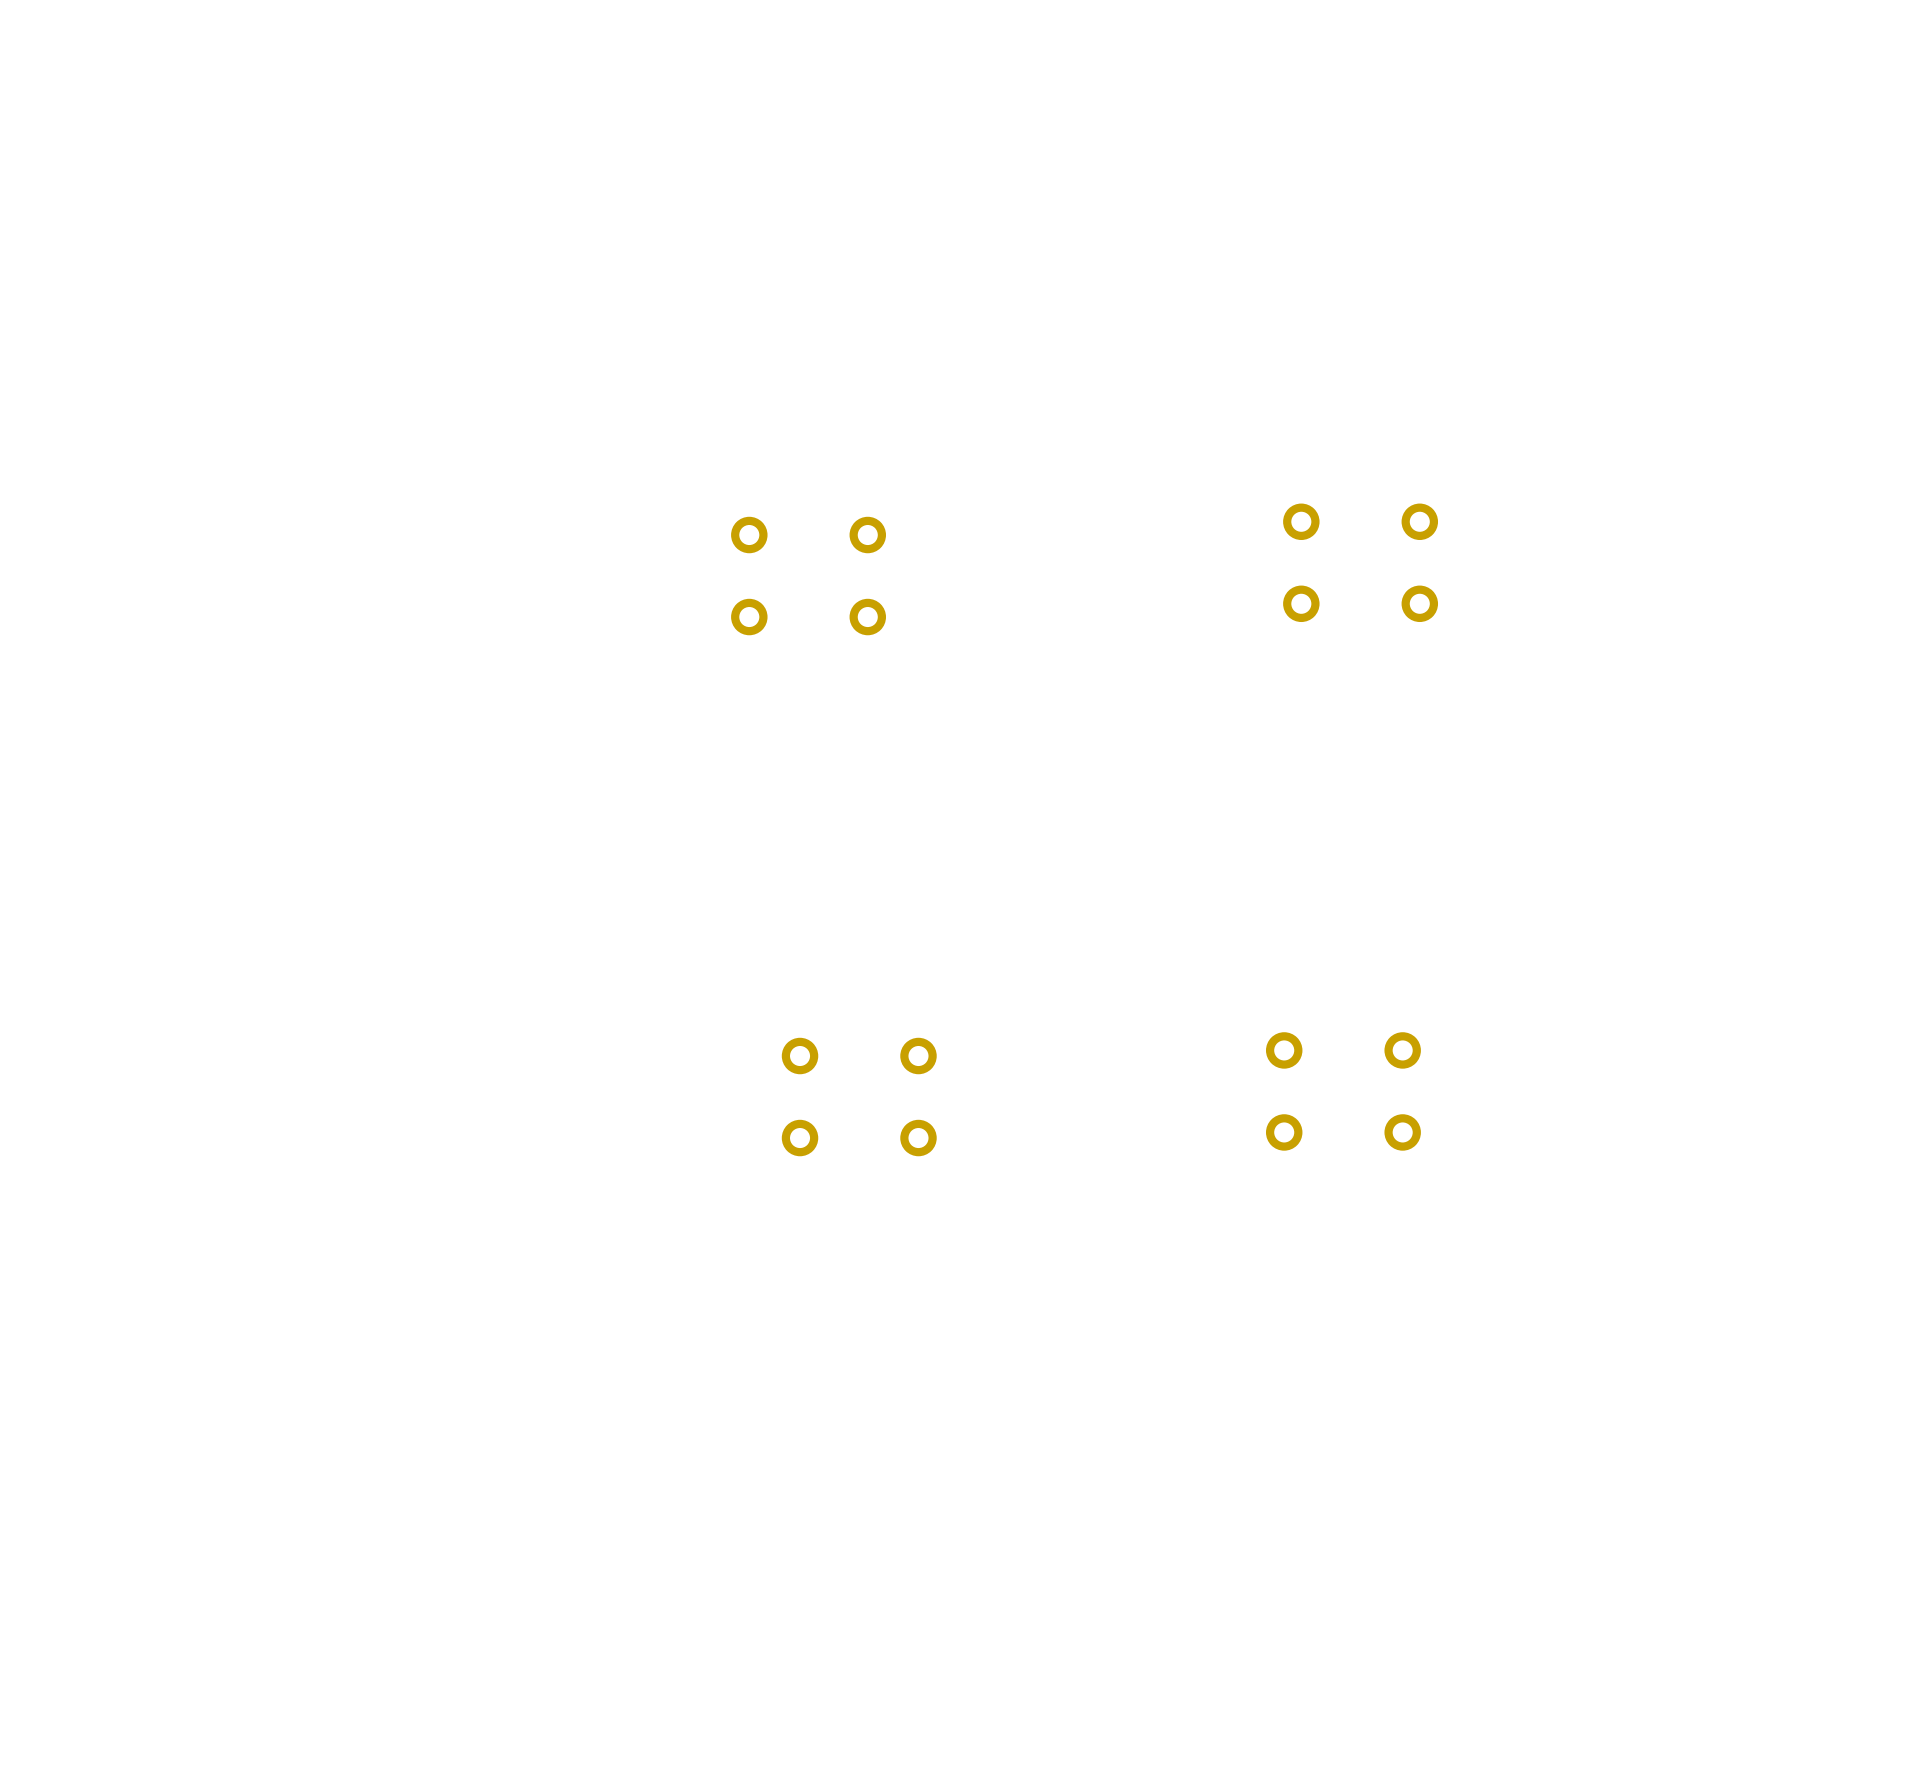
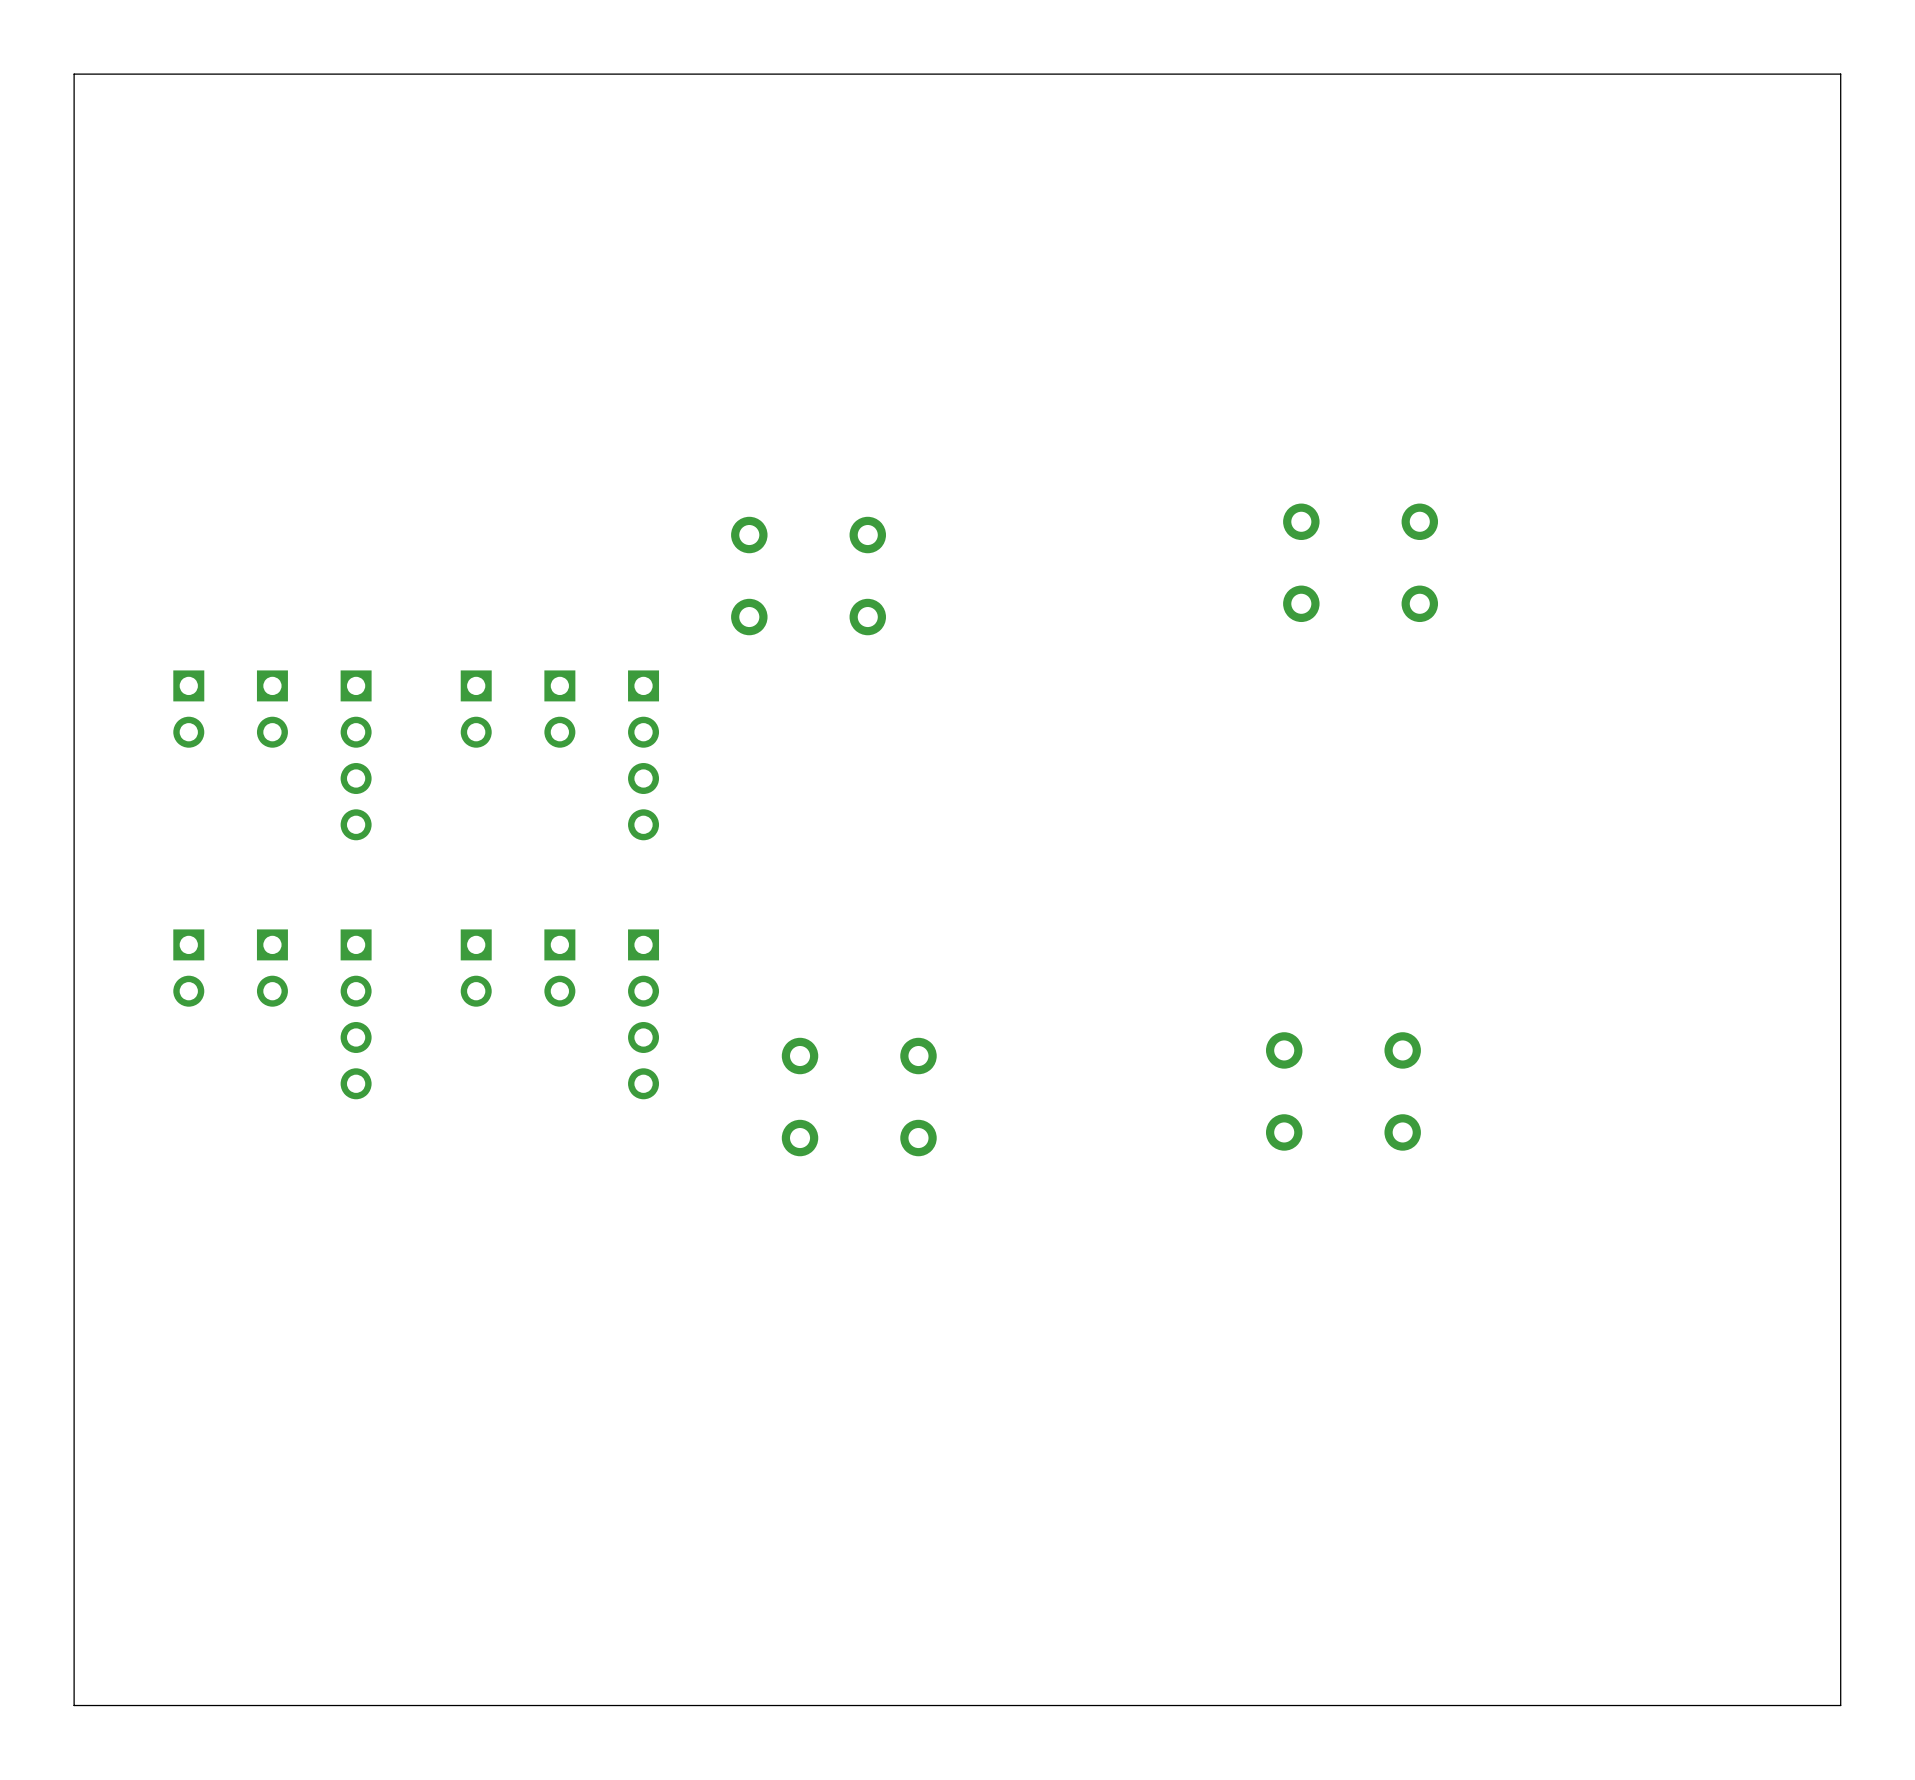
board edge: none -> (1840, 74) (74, 74) (74, 1705) (1840, 1705) (1840, 74)
part: none -> (188, 709)
part: none -> (272, 709)
part: none -> (476, 709)
part: none -> (559, 709)
part: none -> (356, 755)
part: none -> (643, 755)
part: none -> (188, 968)
part: none -> (272, 968)
part: none -> (476, 968)
part: none -> (559, 968)
part: none -> (356, 1014)
part: none -> (643, 1014)

